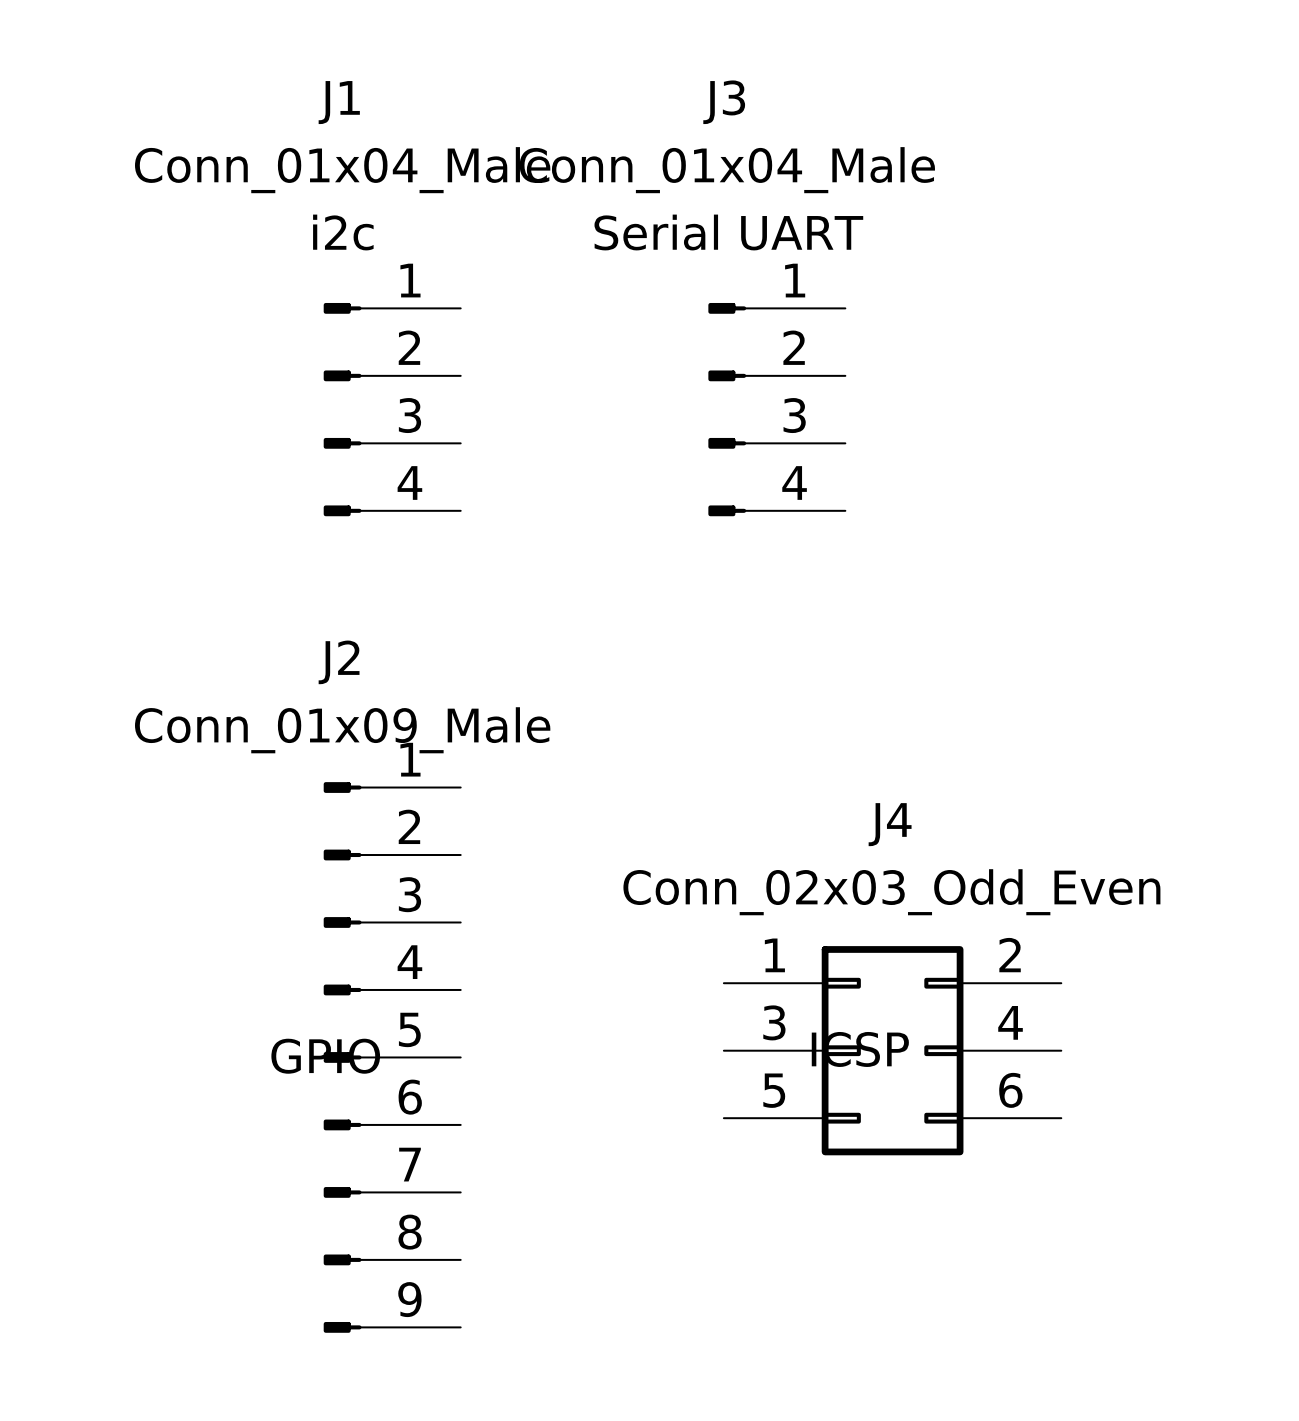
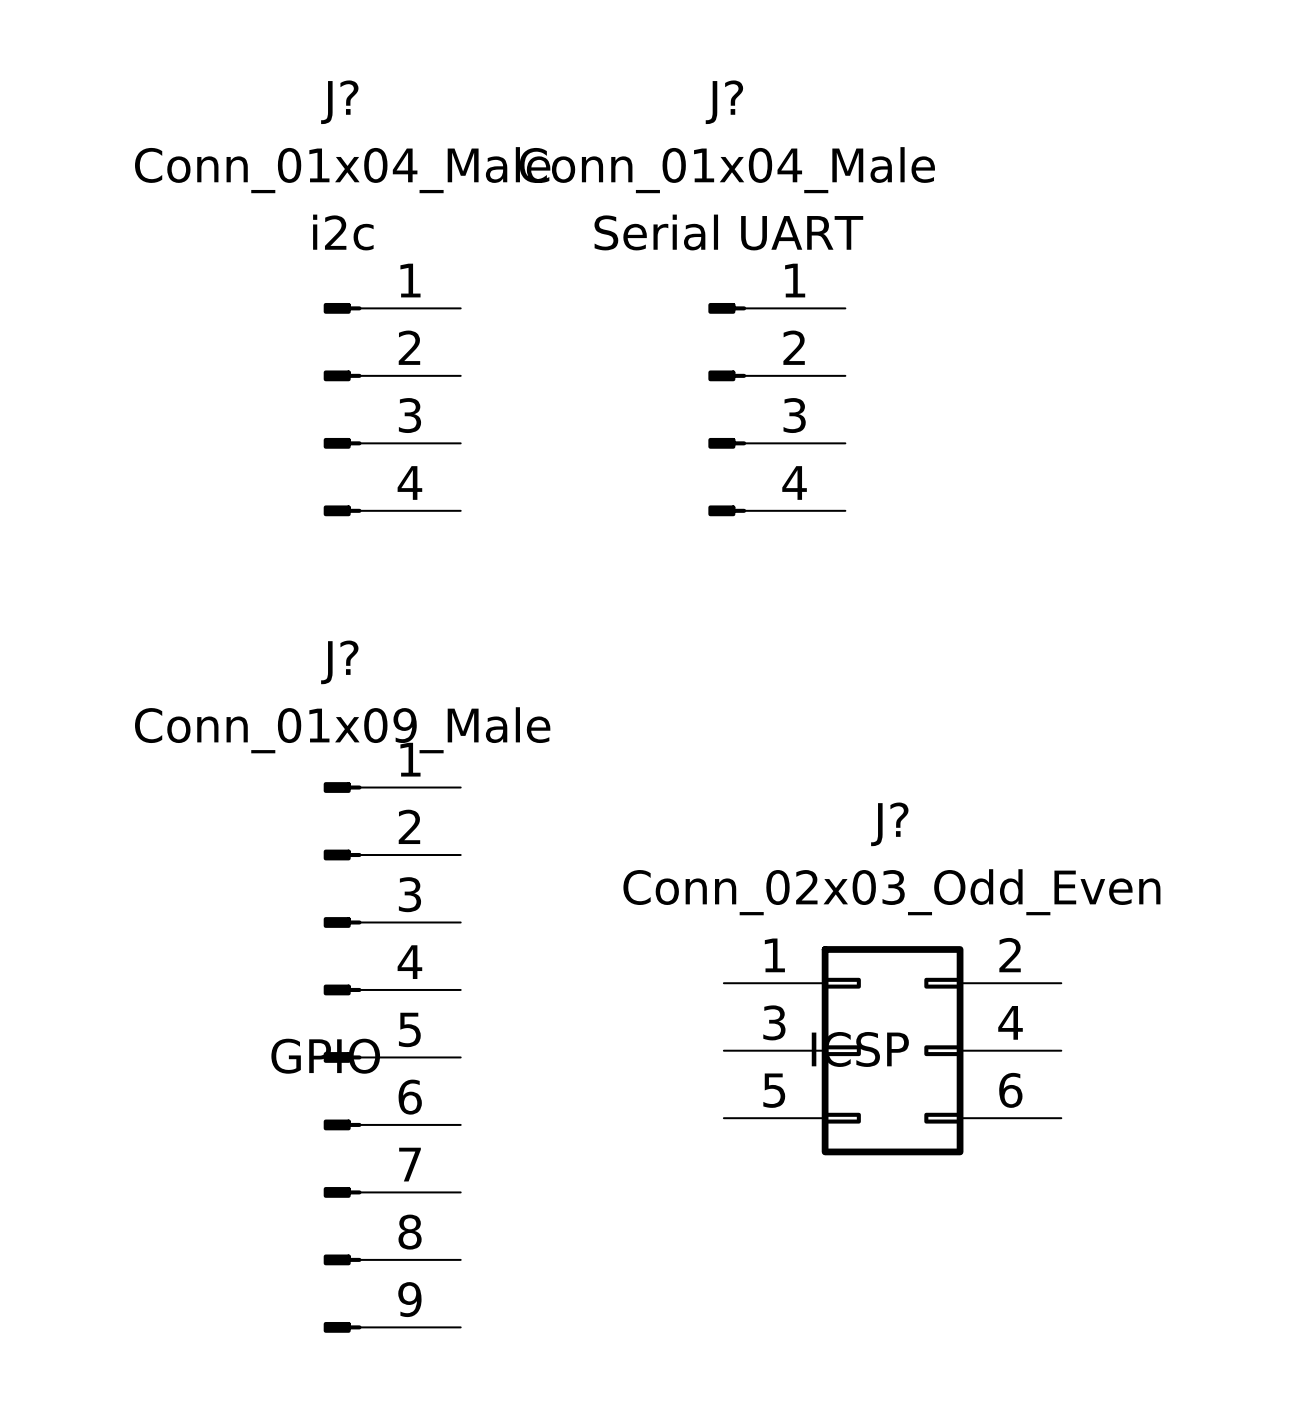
J1 name: J1 (339, 102) -> J? (339, 102)
J3 name: J3 (724, 102) -> J? (724, 102)
J2 name: J2 (339, 662) -> J? (339, 662)
J4 name: J4 (890, 824) -> J? (889, 824)

